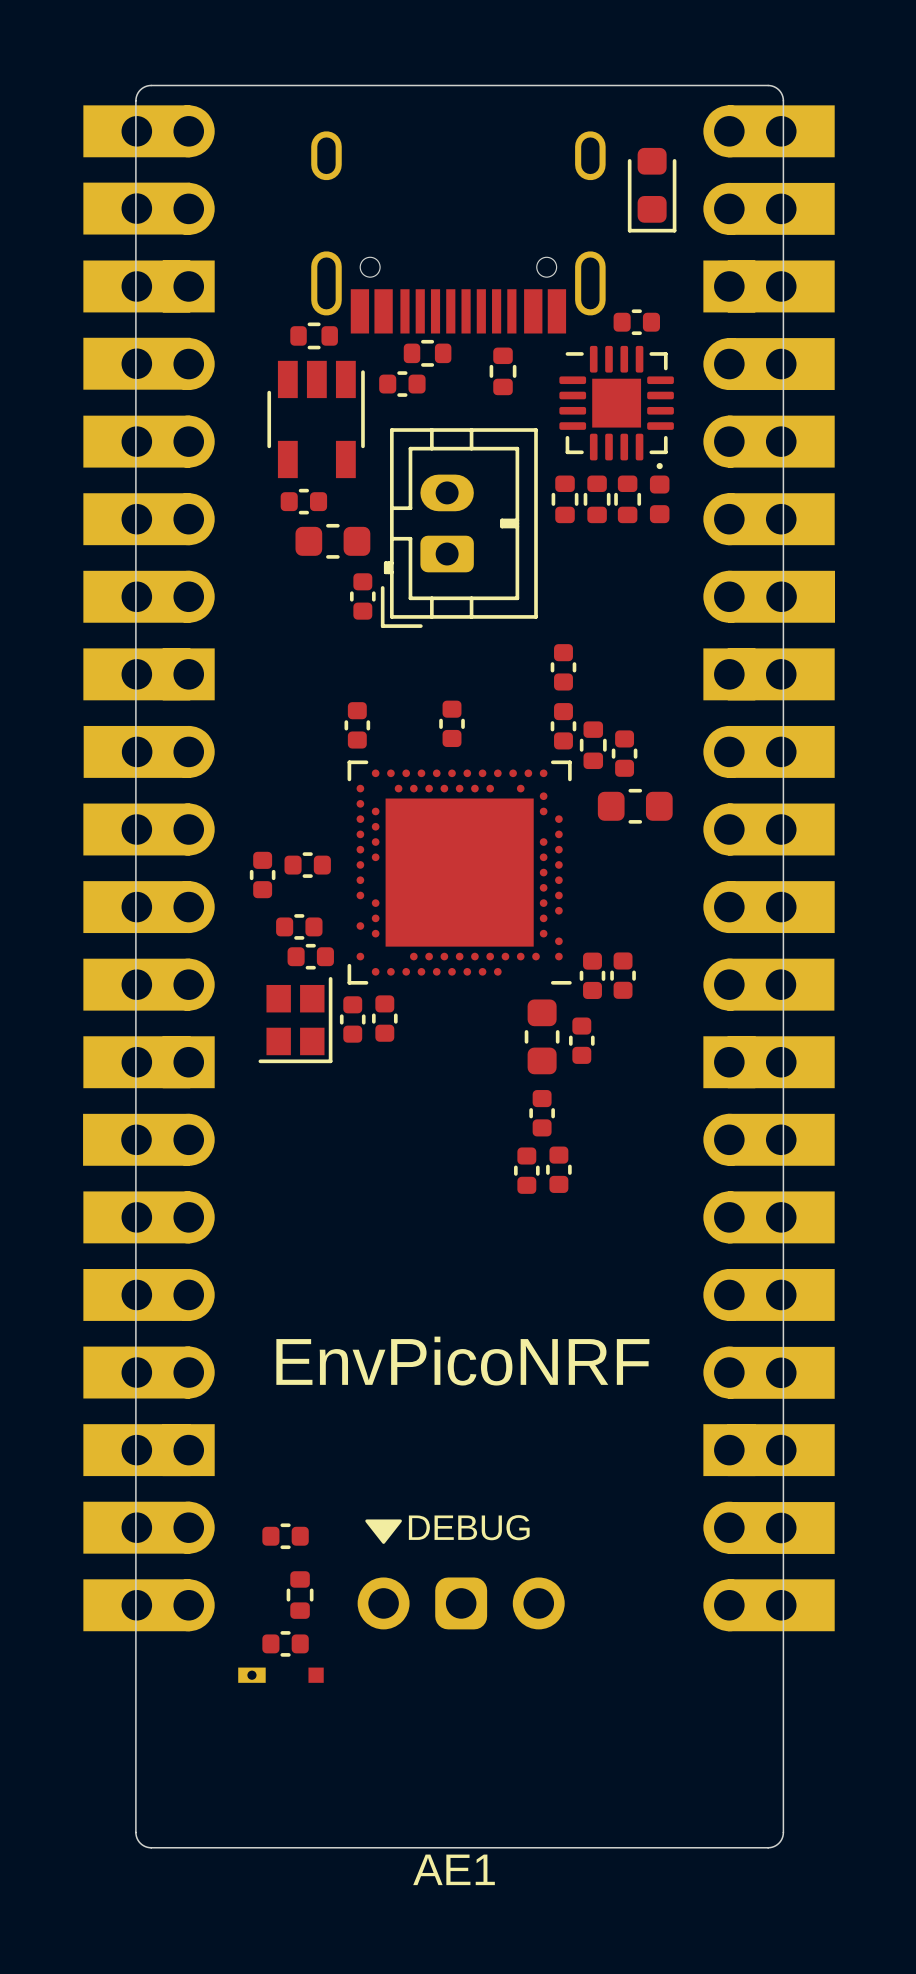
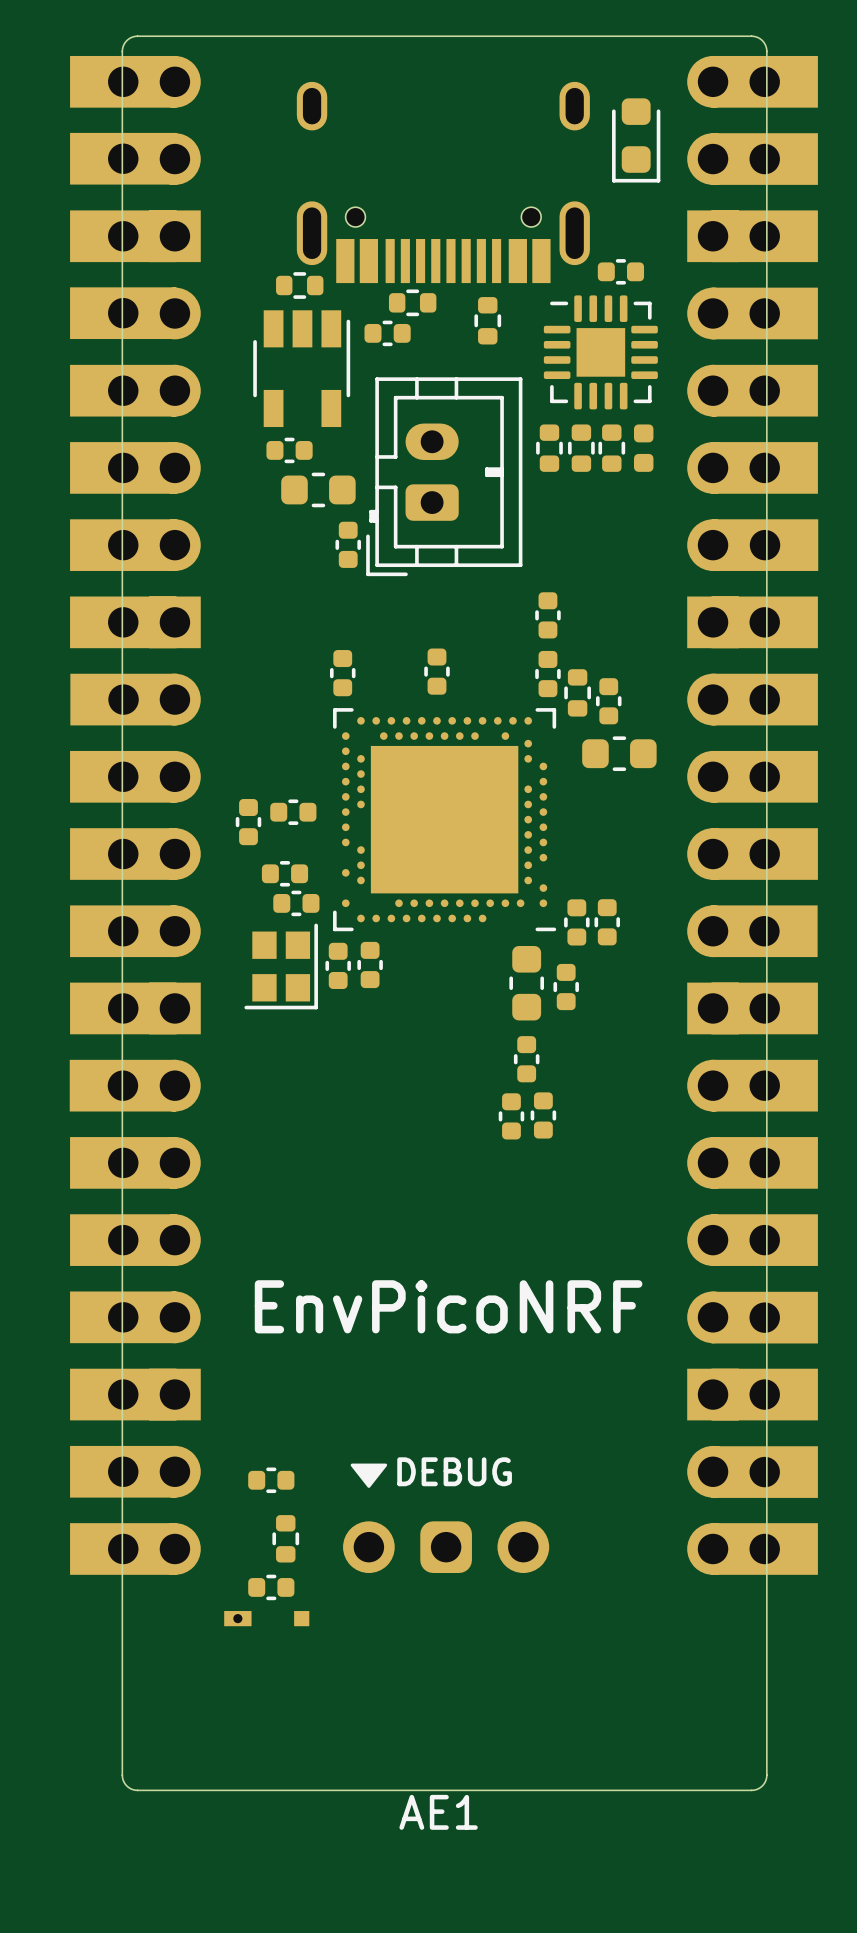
part footprint: [649, 463, 670, 524] -> [633, 424, 654, 472]

